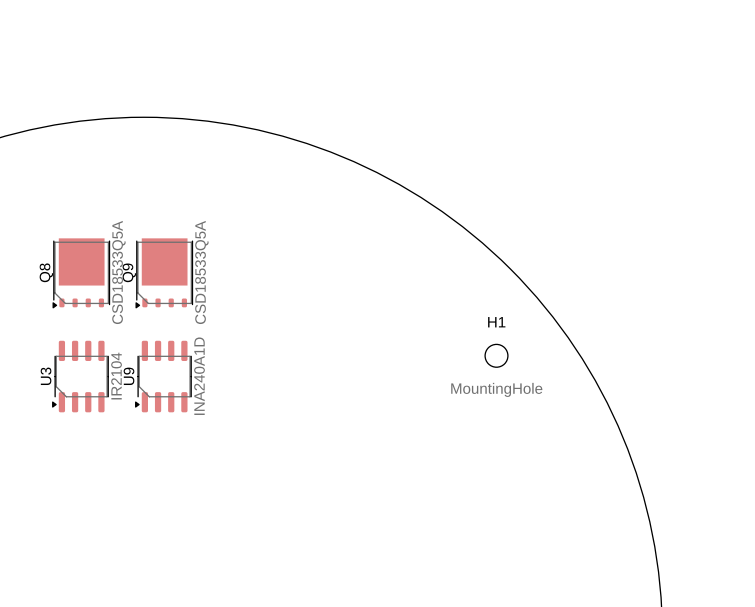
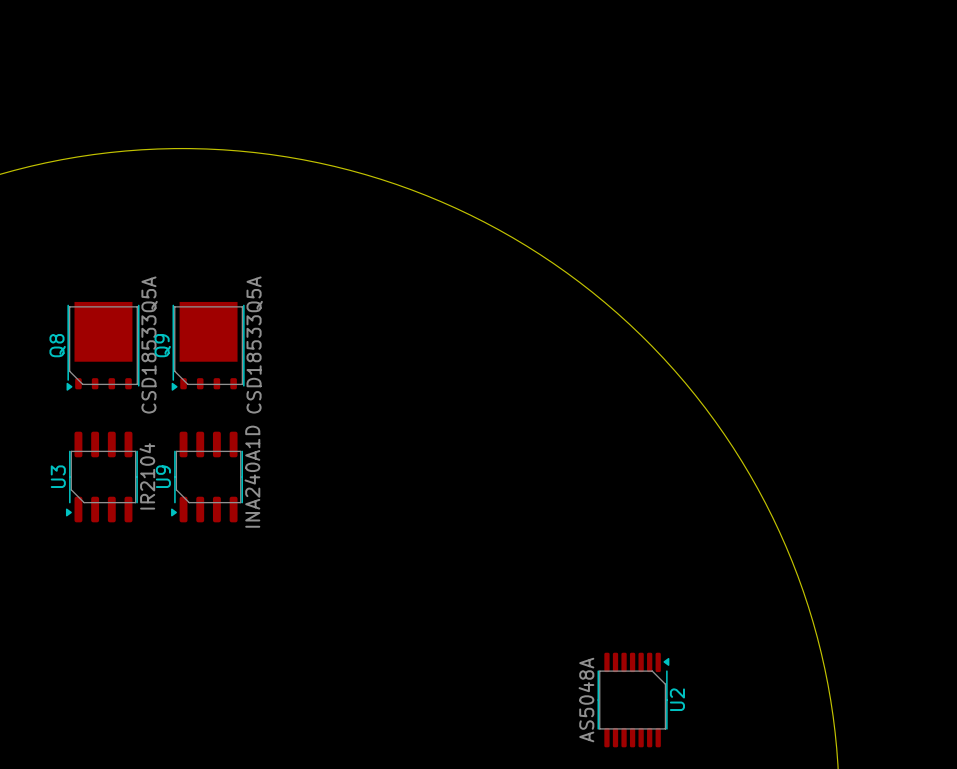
H1: MountingHole (496, 355) -> none
U2: none -> AS5048A (633, 700)

